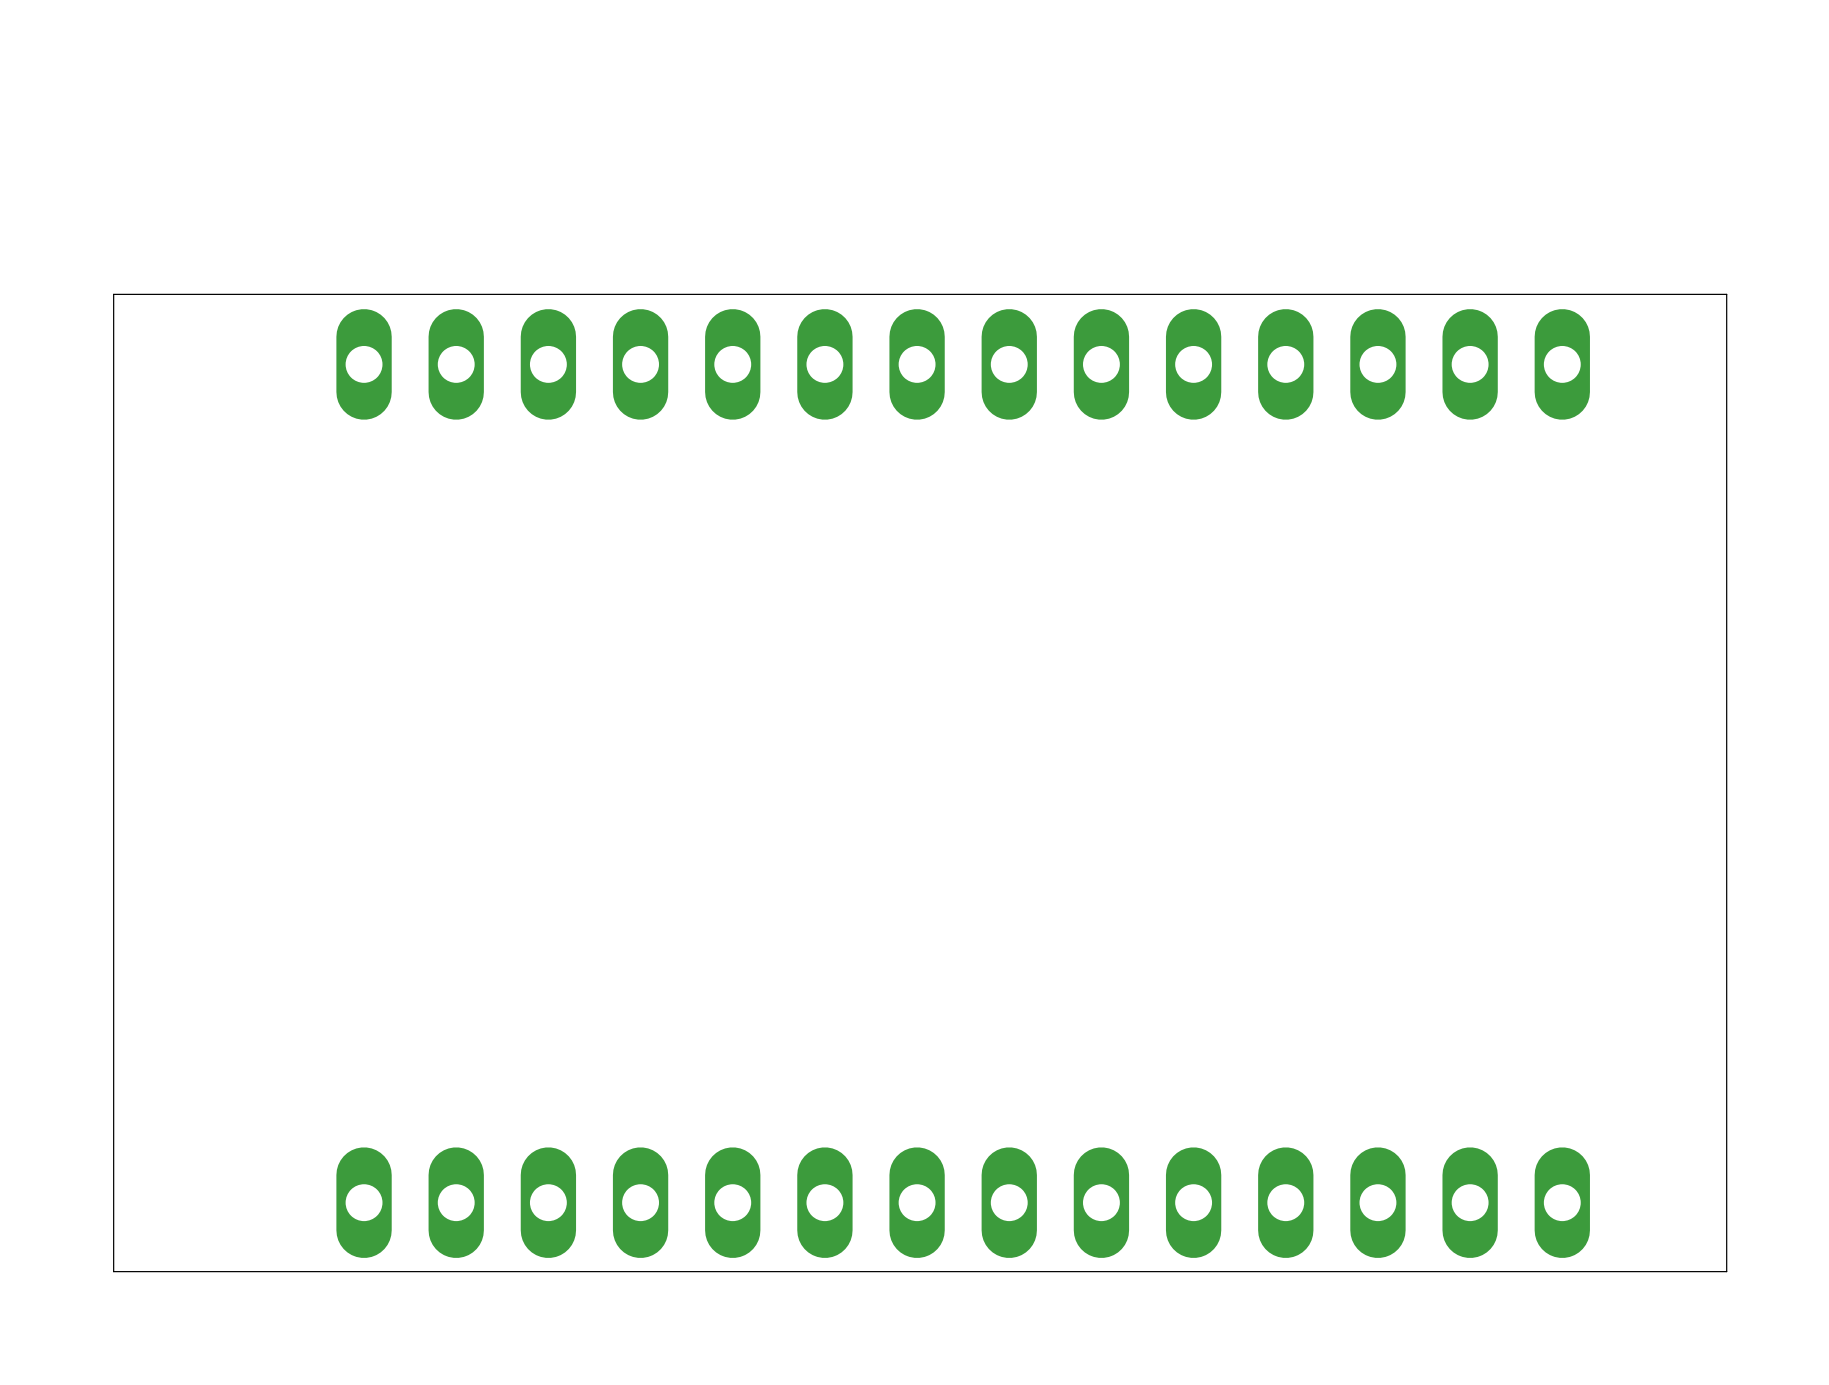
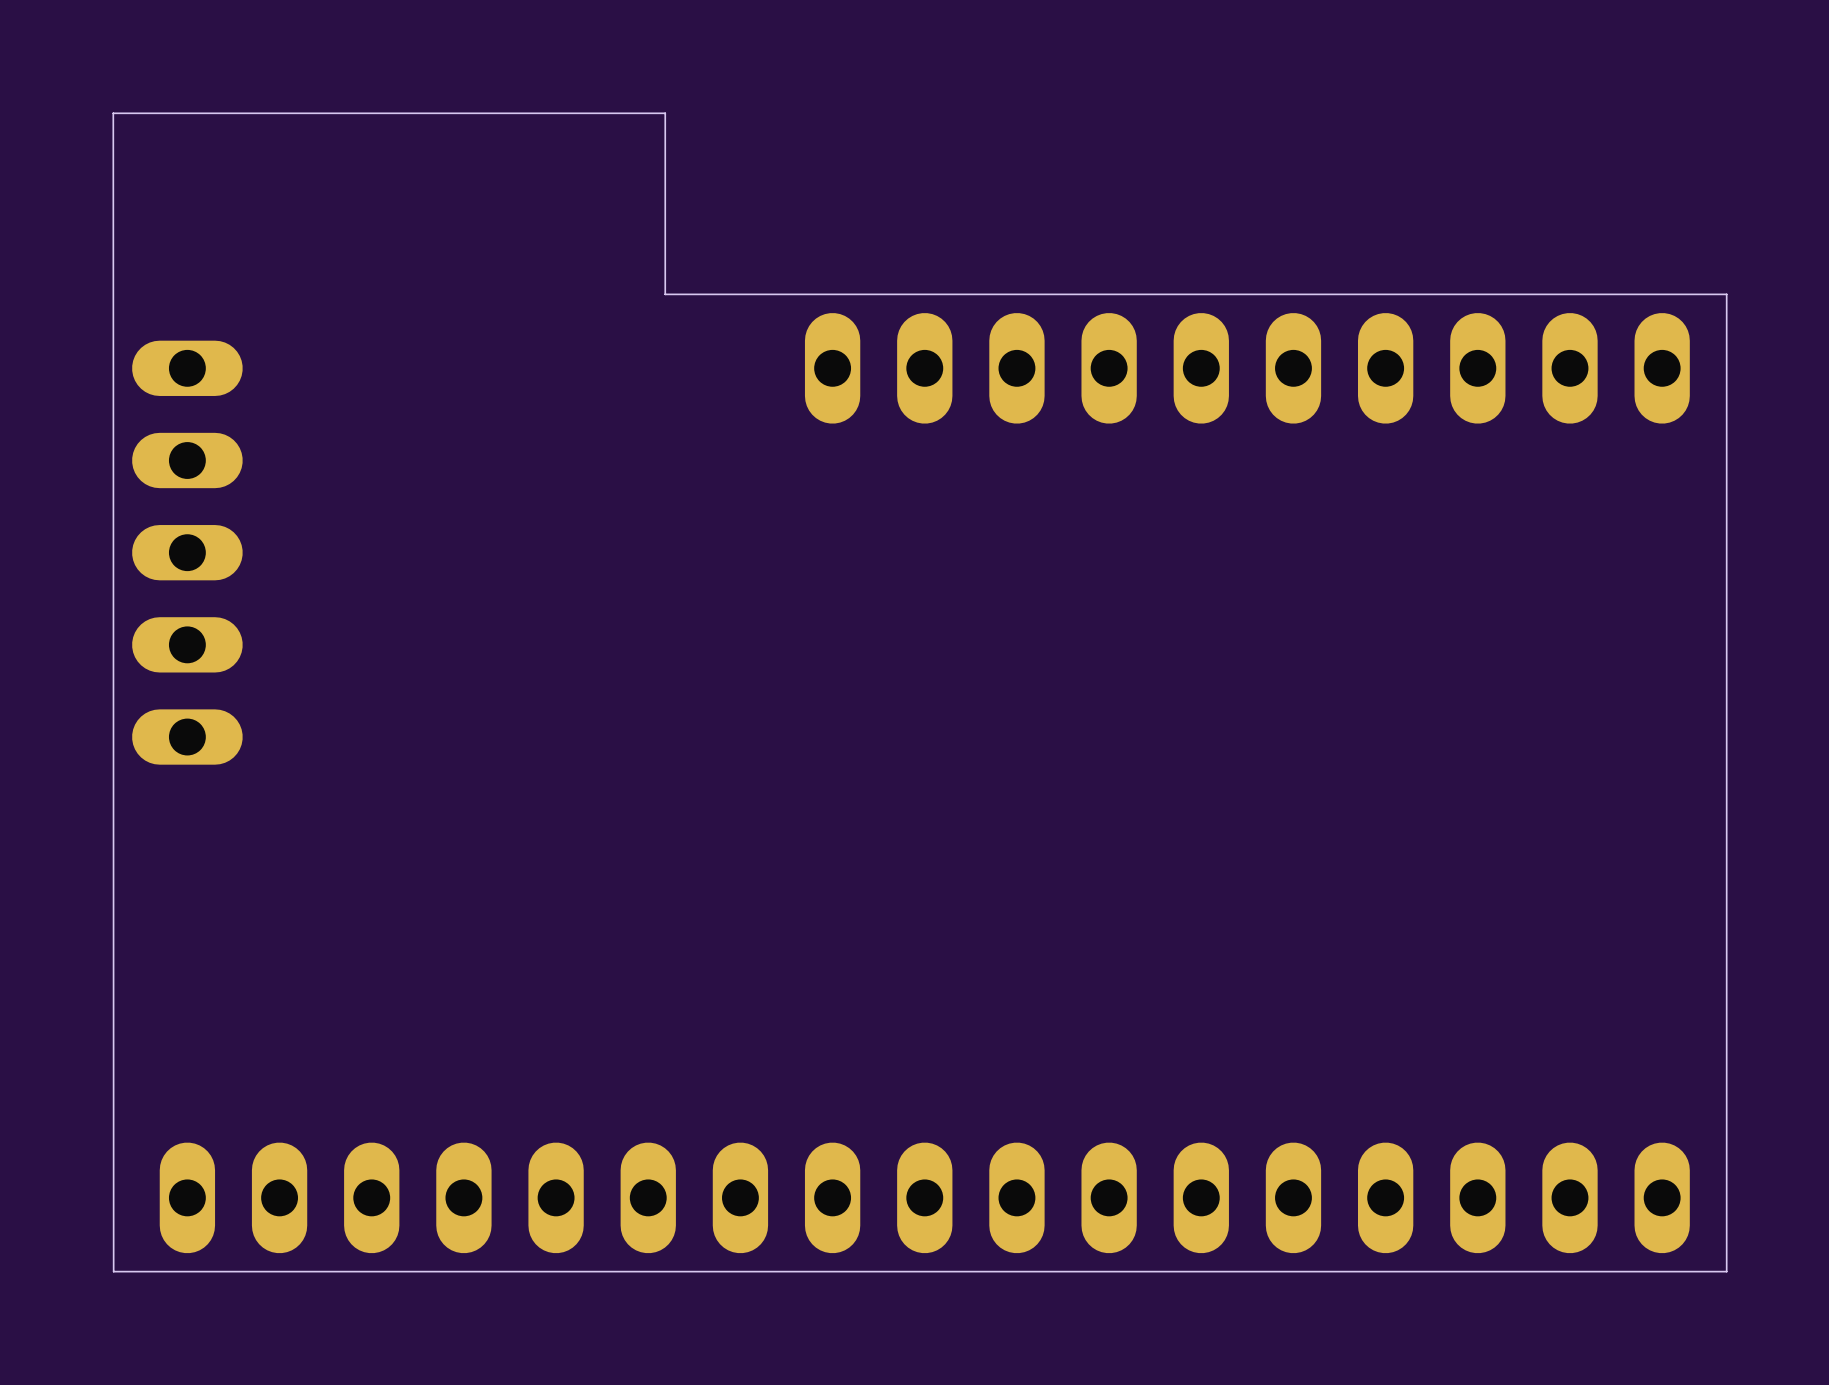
board edge: (665, 294) (113, 294) (113, 1271) -> (665, 294) (665, 113) (113, 113) (113, 1271)
part: (963, 364) -> none
part: none -> (1247, 368)
part: none -> (187, 552)
part: none -> (924, 1197)
part: (963, 1202) -> none

